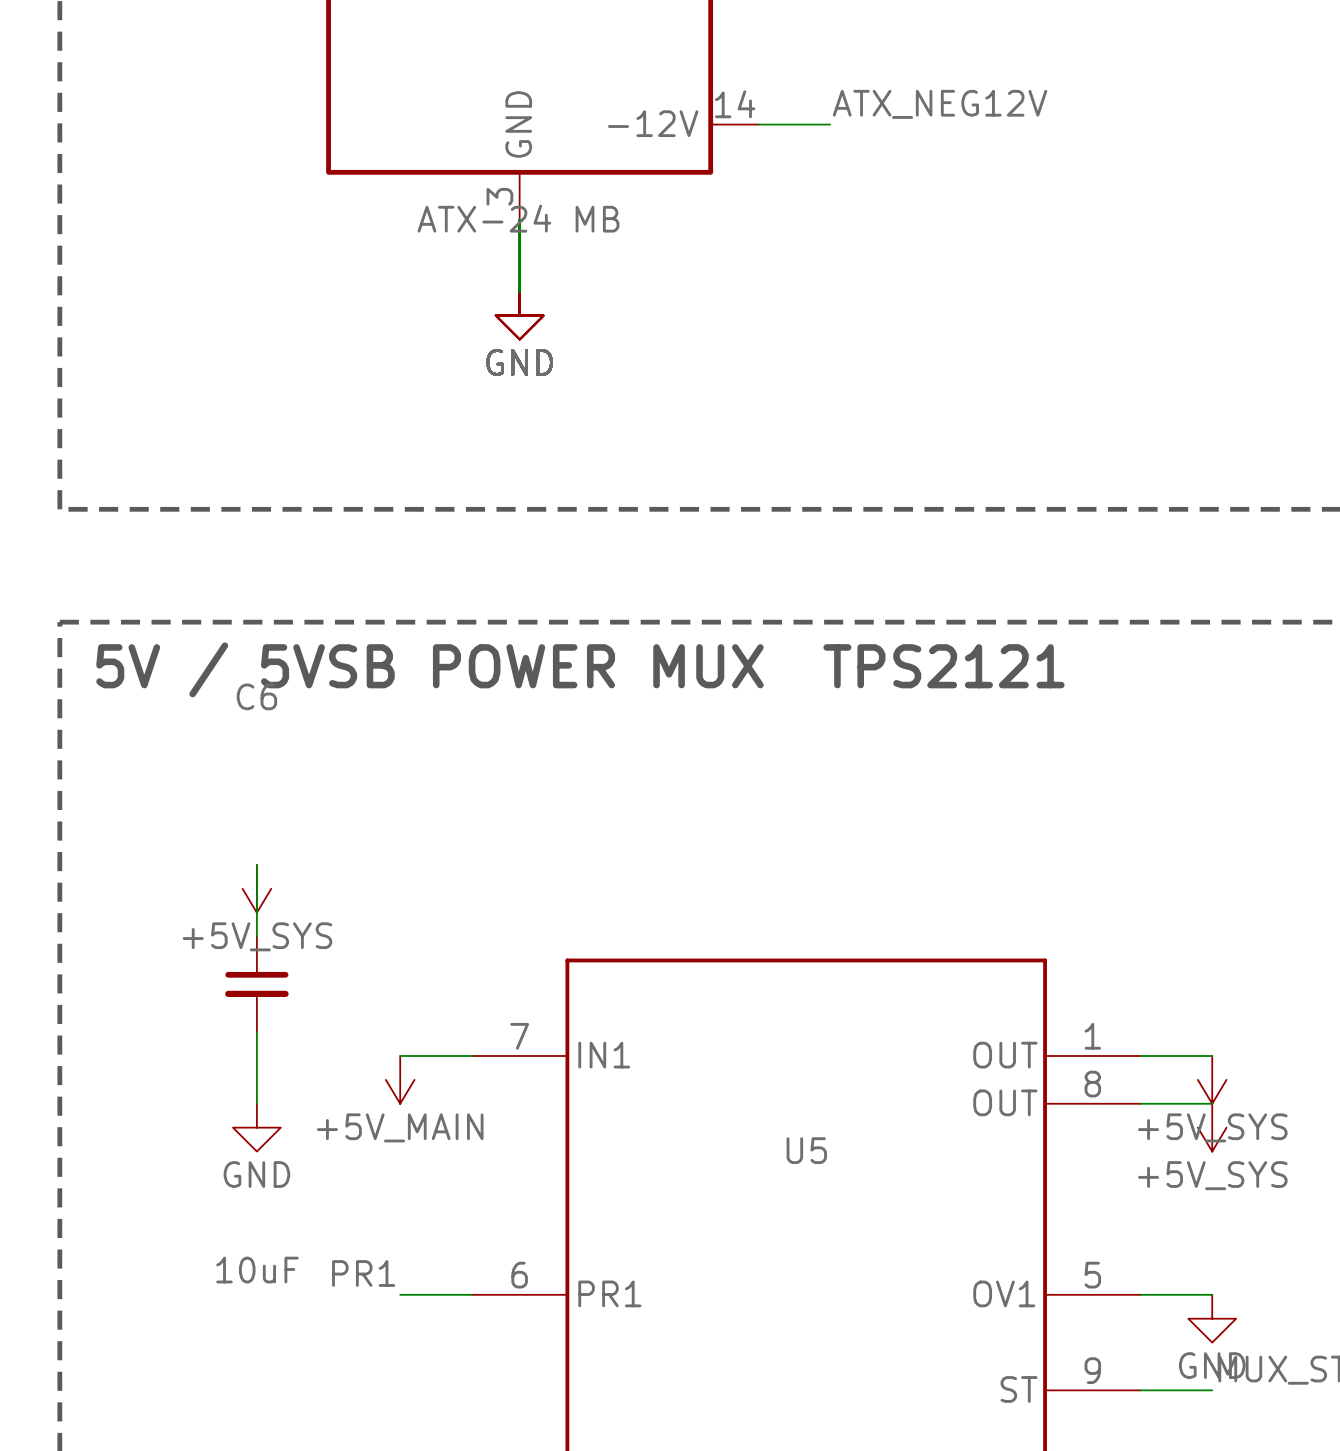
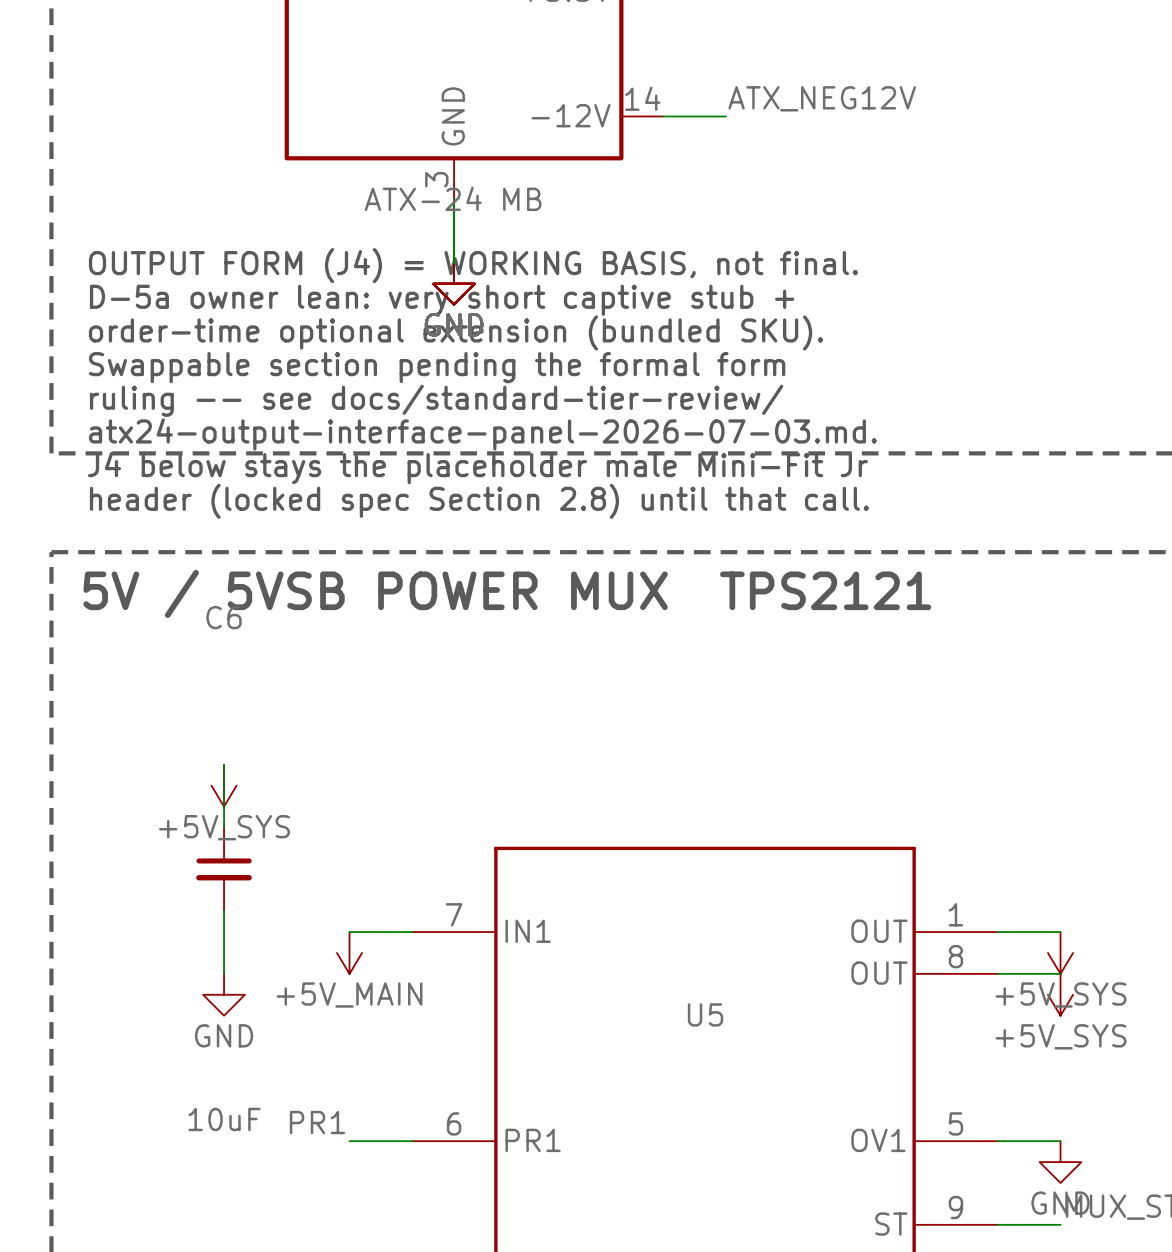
text: none -> OUTPUT FORM (J4) = WORKING BASIS, not final. (473, 265)
text: none -> D-5a owner lean: very short captive stub + (442, 300)
text: none -> order-time optional extension (bundled SKU). (456, 332)
text: none -> Swappable section pending the formal form (437, 367)
text: none -> ruling -- see docs/standard-tier-review/ (436, 400)
text: none -> atx24-output-interface-panel-2026-07-03.md. (482, 434)
text: none -> J4 below stays the placeholder male Mini-Fit Jr (477, 468)
text: none -> header (locked spec Section 2.8) until that call. (479, 501)

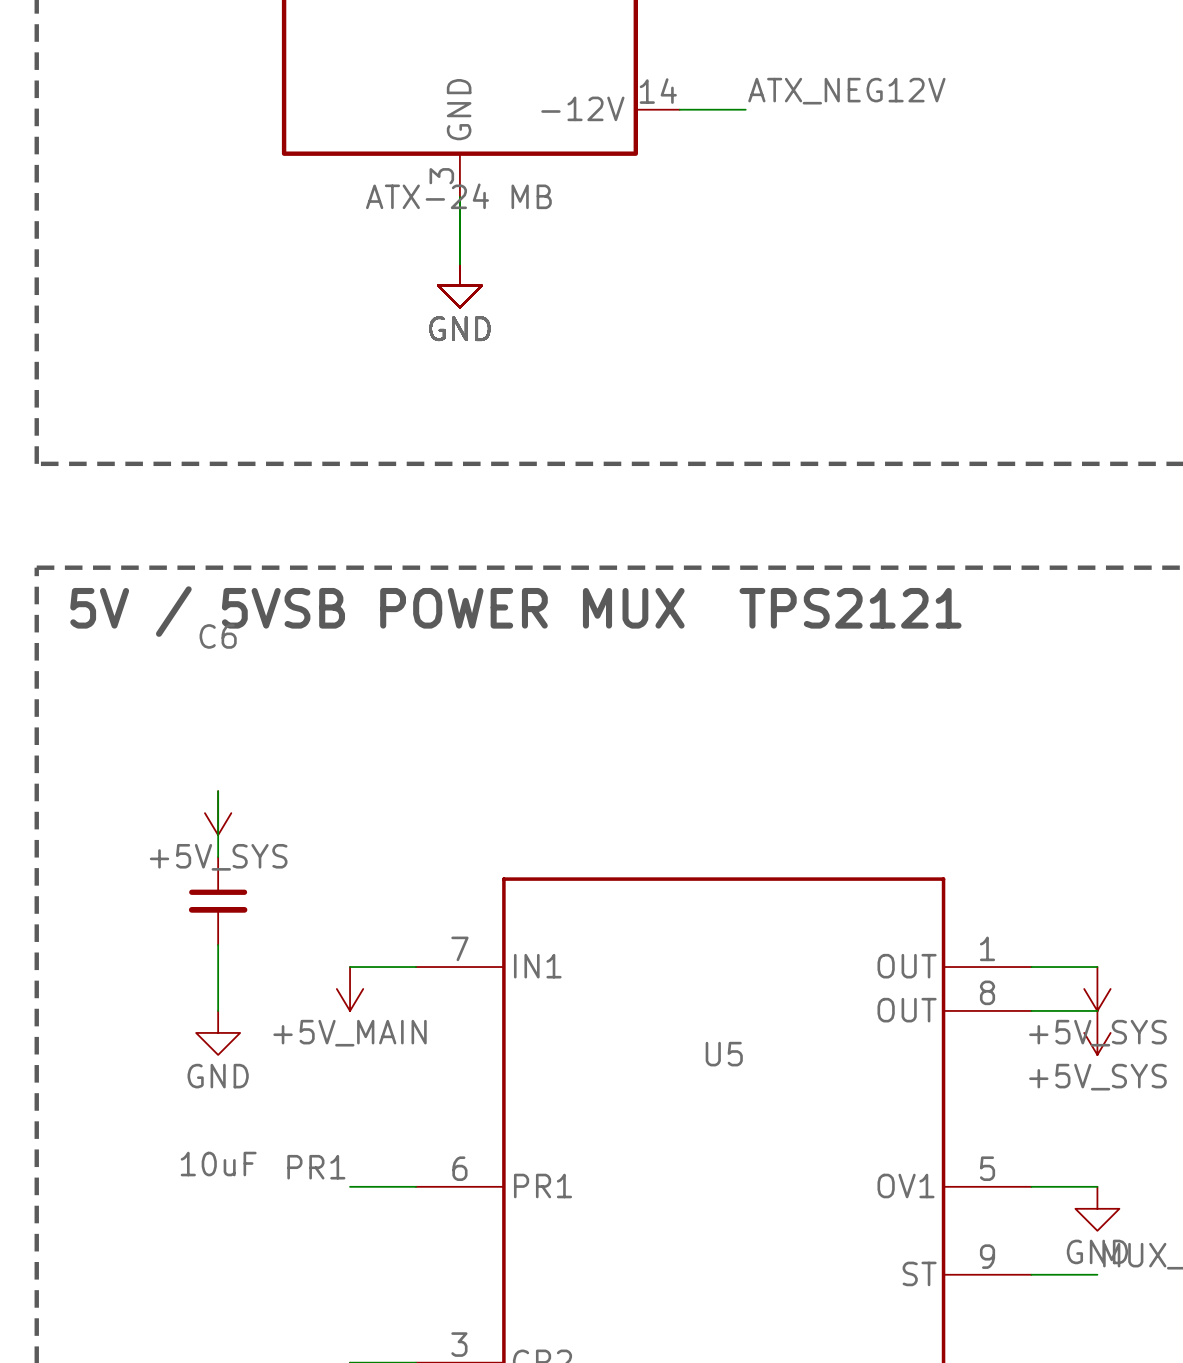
text: OUTPUT FORM (J4) = WORKING BASIS, not final. (473, 265) -> none
text: D-5a owner lean: very short captive stub + (442, 300) -> none
text: order-time optional extension (bundled SKU). (456, 332) -> none
text: Swappable section pending the formal form (437, 367) -> none
text: ruling -- see docs/standard-tier-review/ (436, 400) -> none
text: atx24-output-interface-panel-2026-07-03.md. (482, 434) -> none
text: J4 below stays the placeholder male Mini-Fit Jr (477, 468) -> none
text: header (locked spec Section 2.8) until that call. (479, 501) -> none

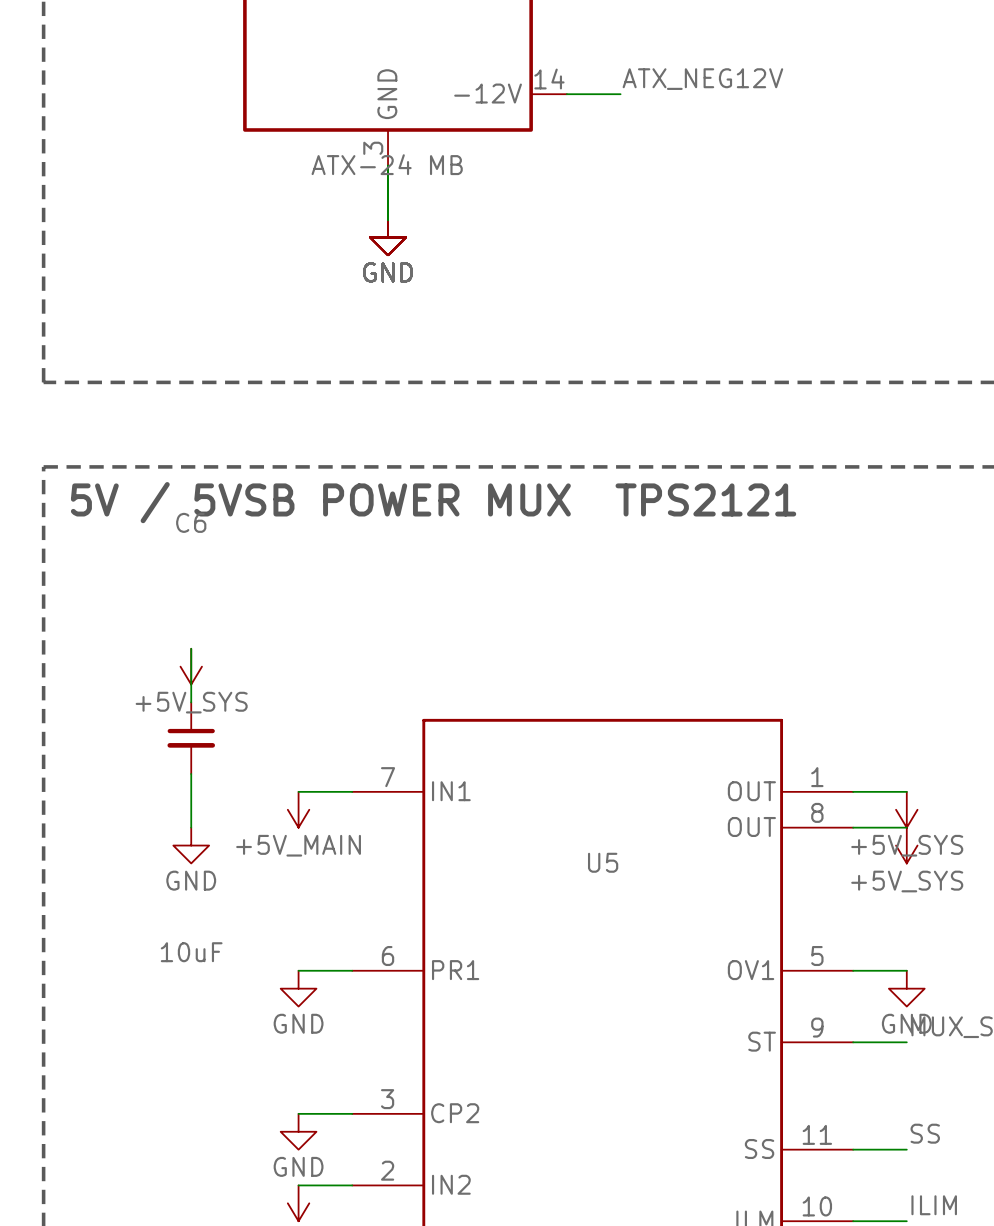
label: PR1 (316, 1167) -> none
power symbol: none -> GND (298, 988)

